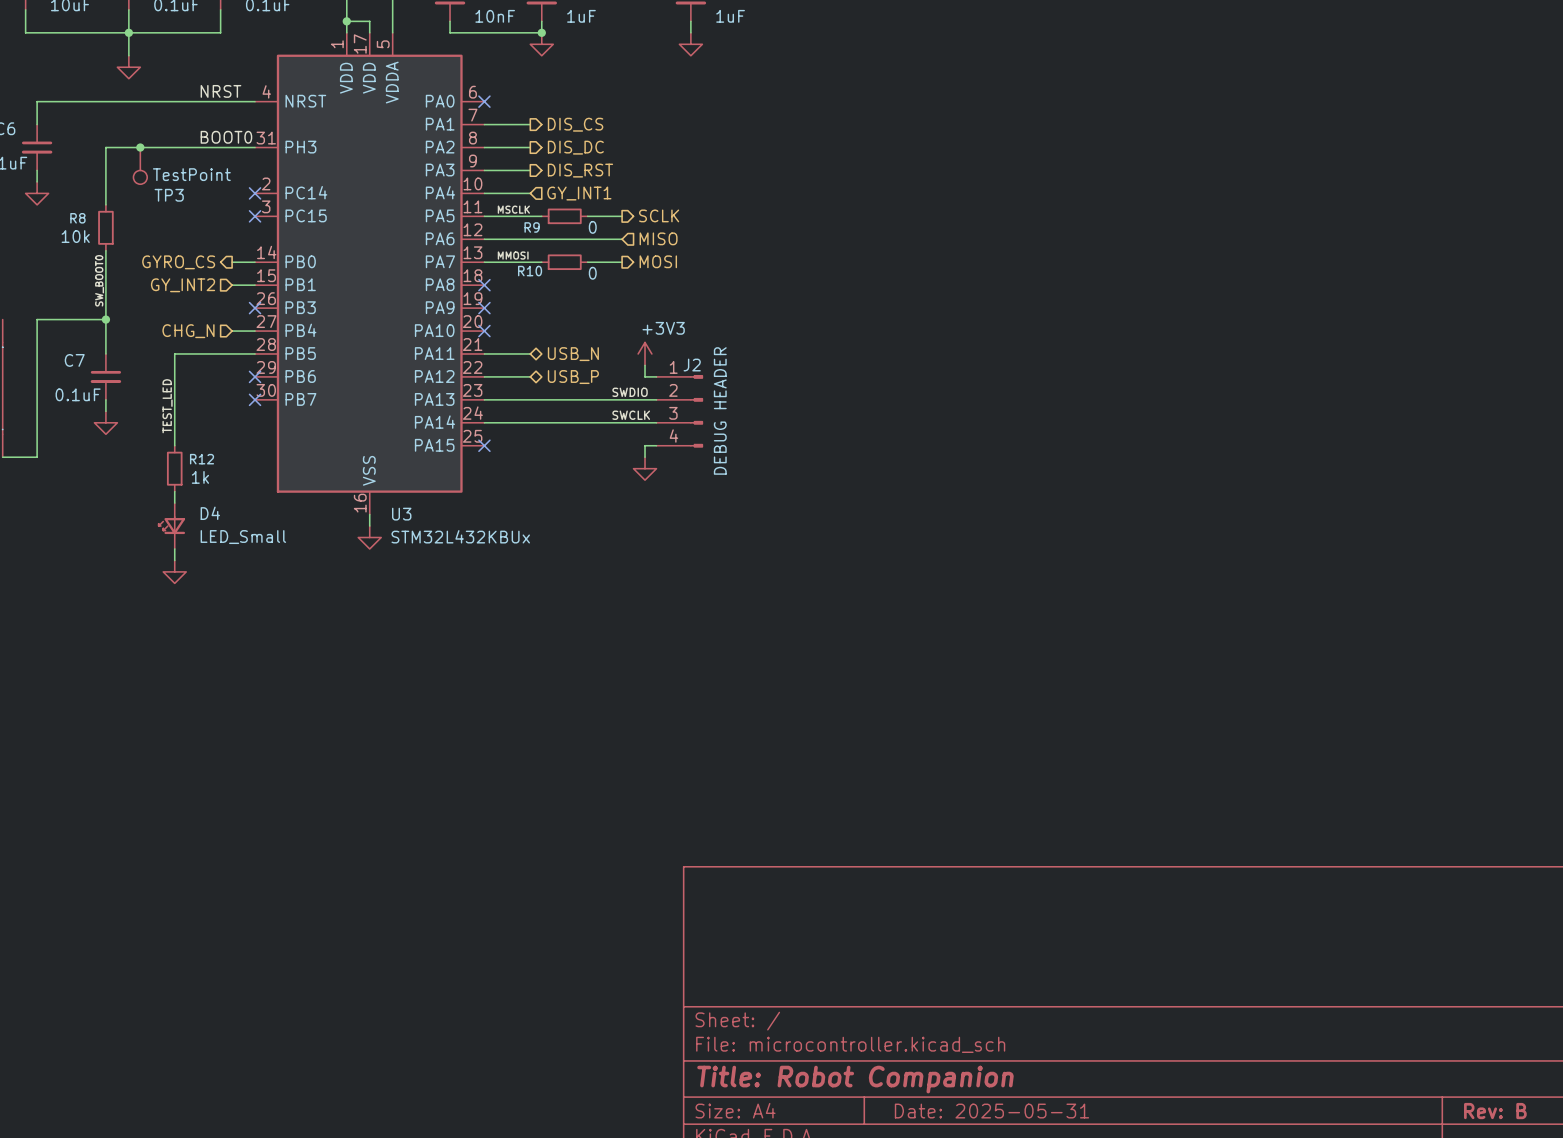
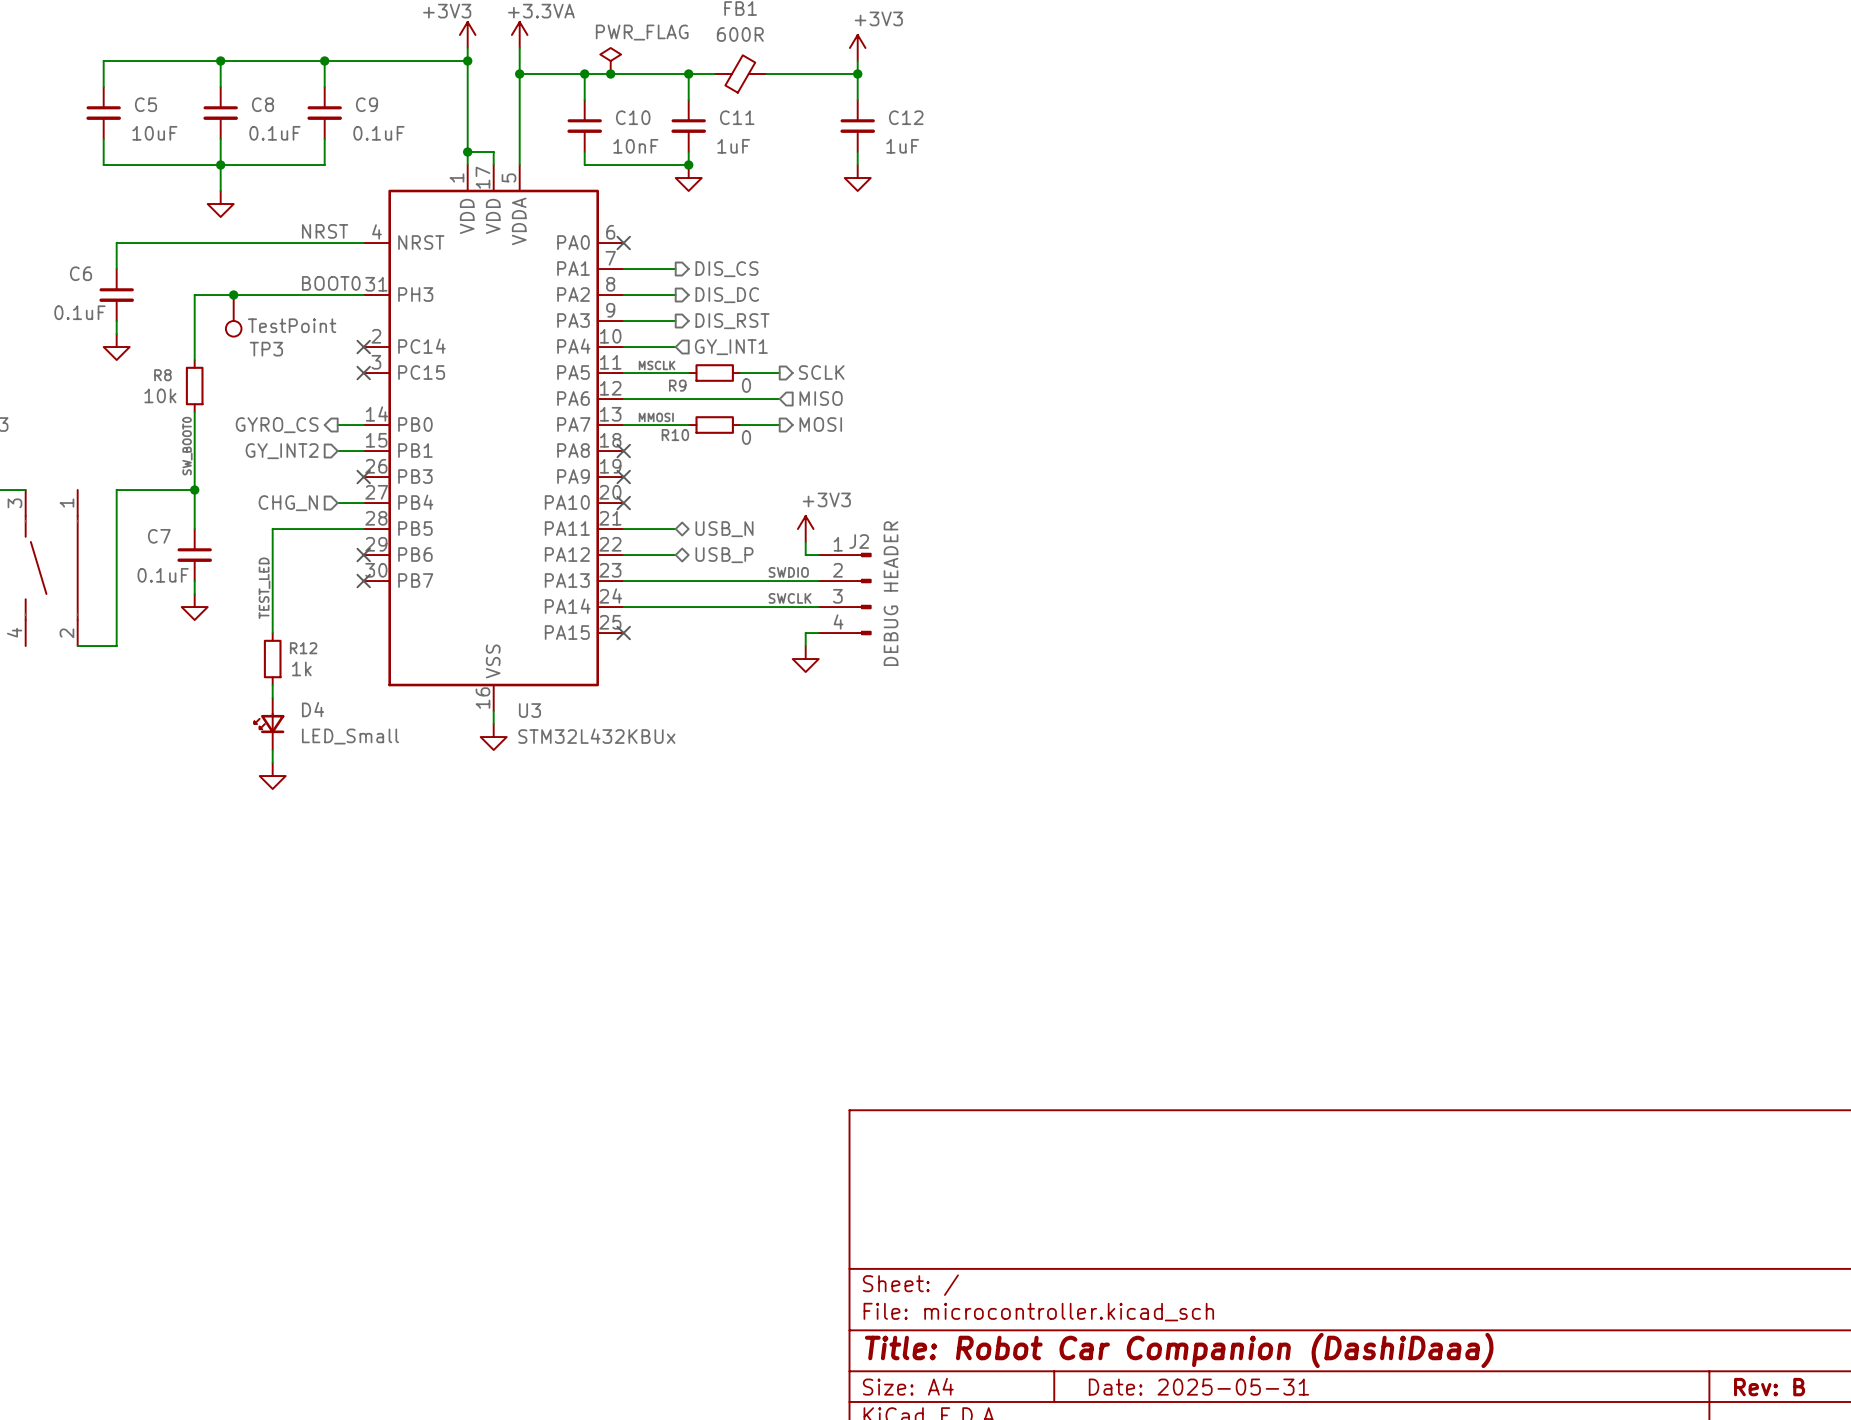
title block: Title: Robot Companion (855, 1079) -> Title: Robot Car Companion (DashiDaaa) (1179, 1350)

